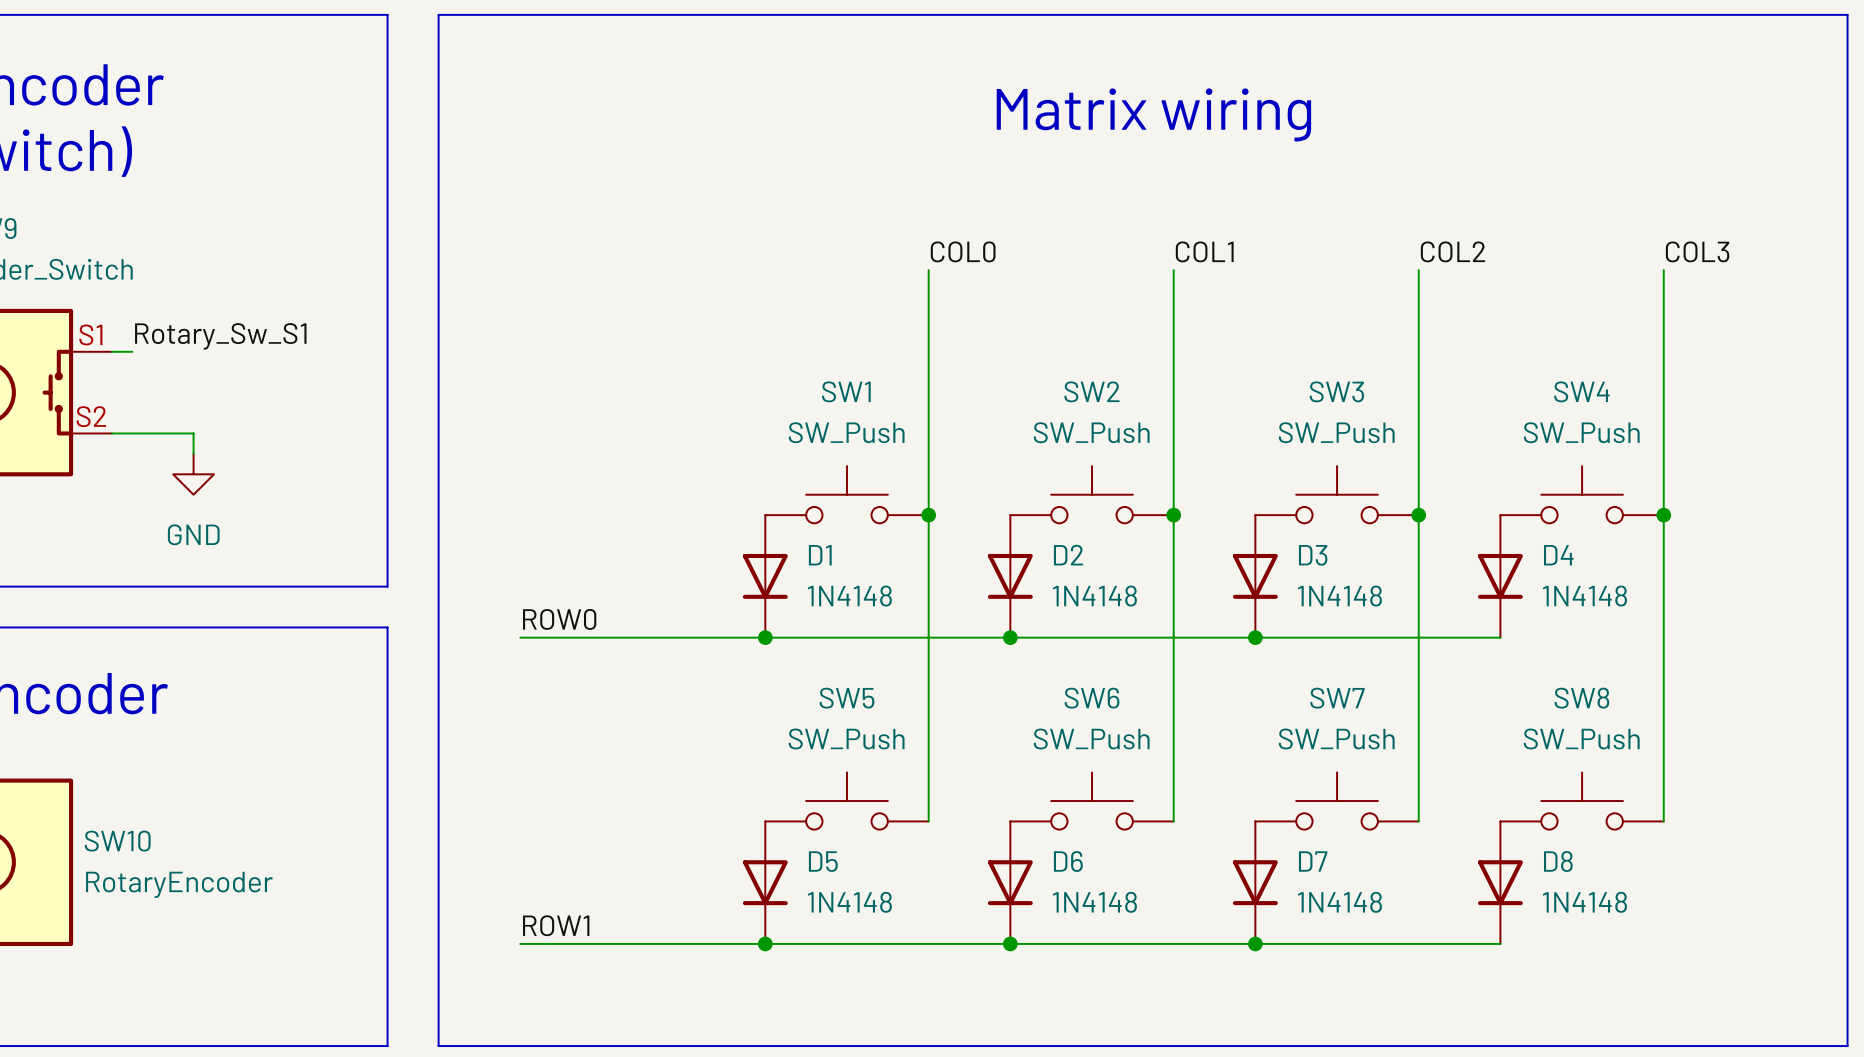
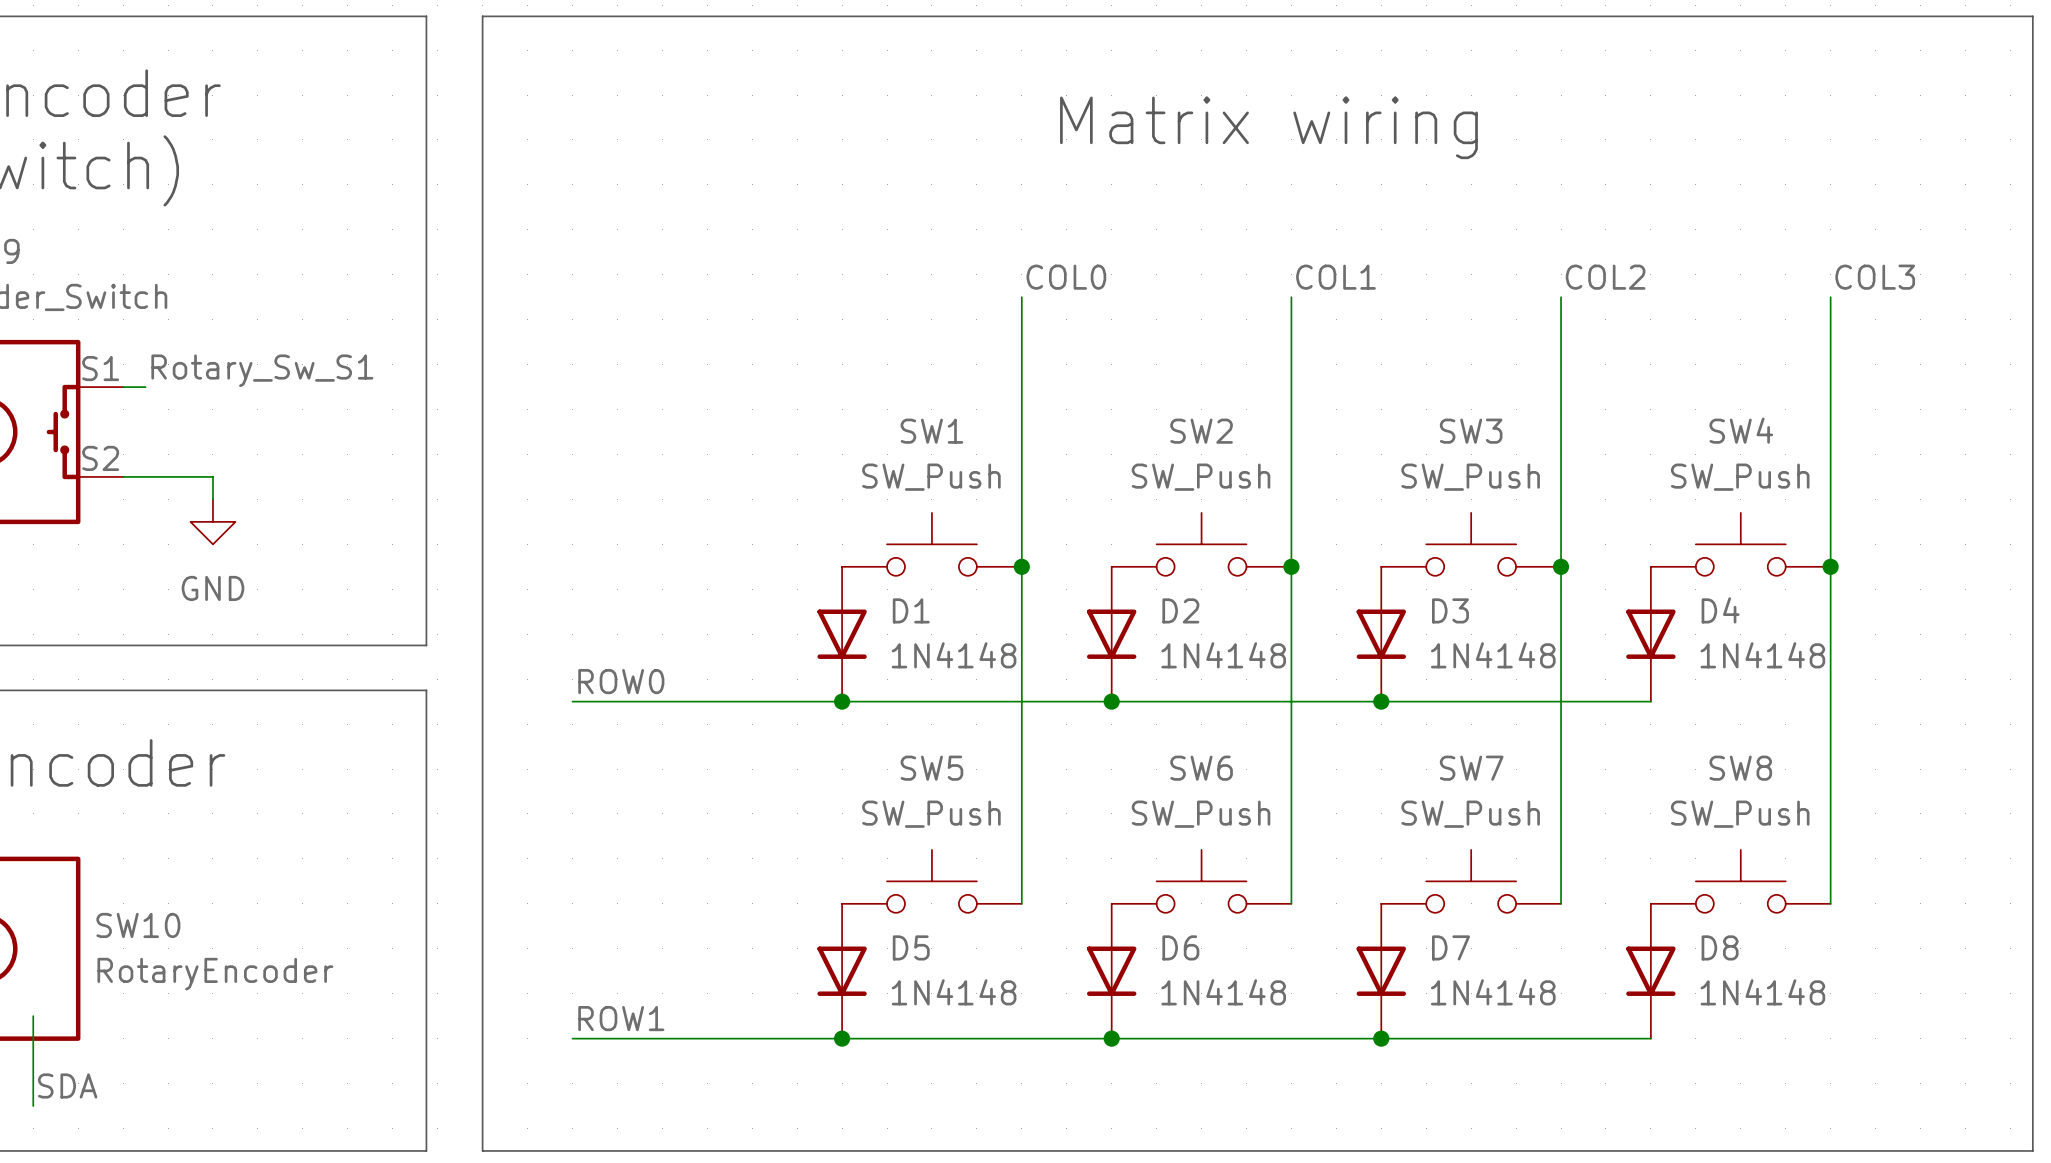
wire: none -> (33, 1016) (33, 1106)
label: none -> SDA (67, 1085)

